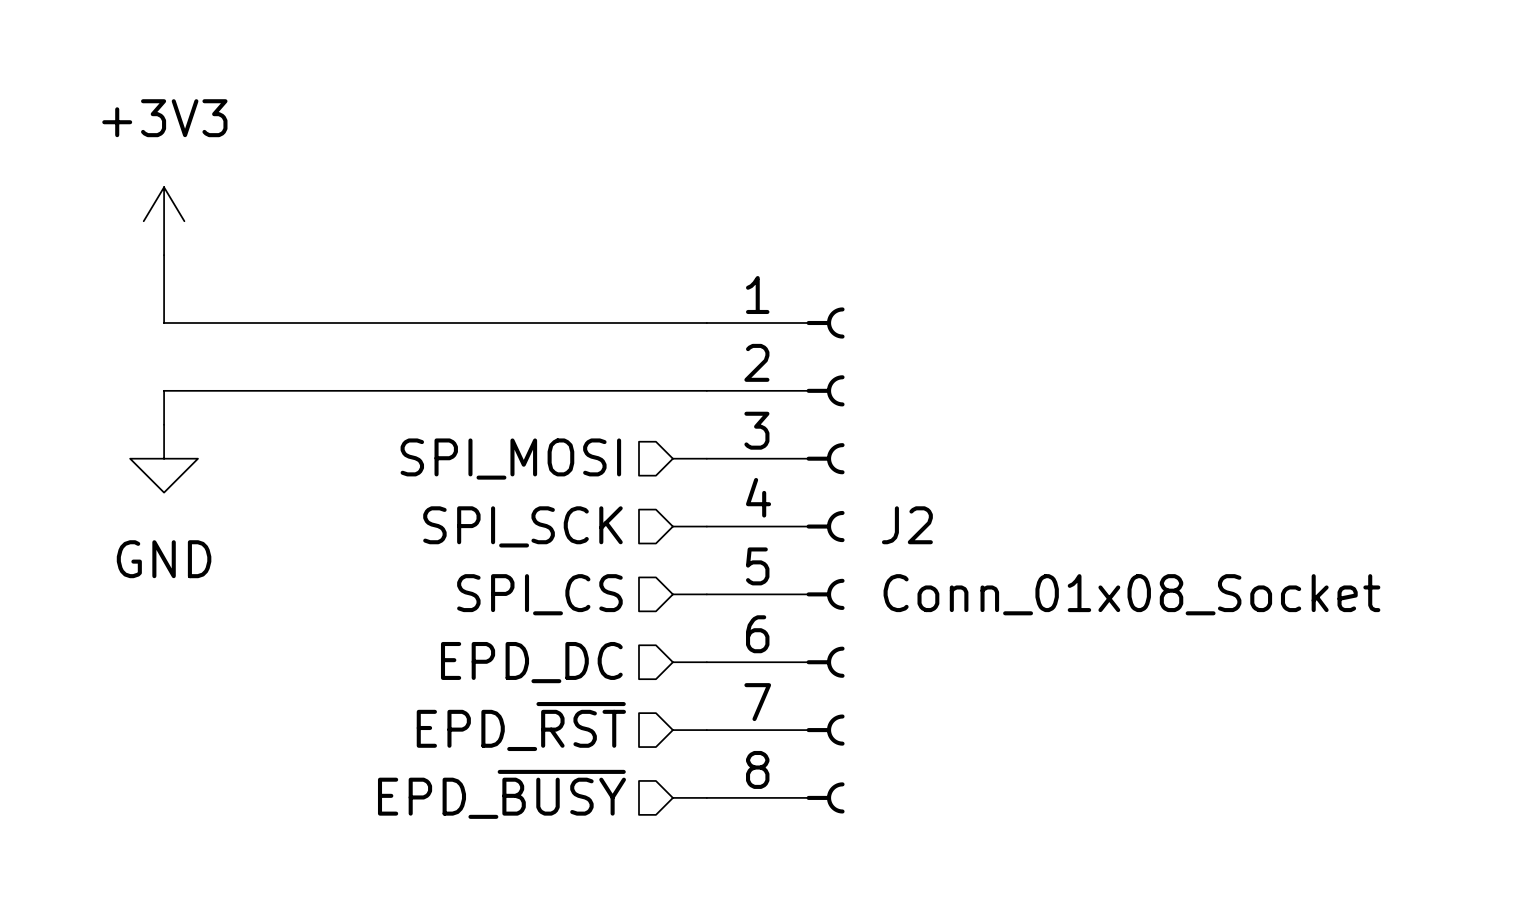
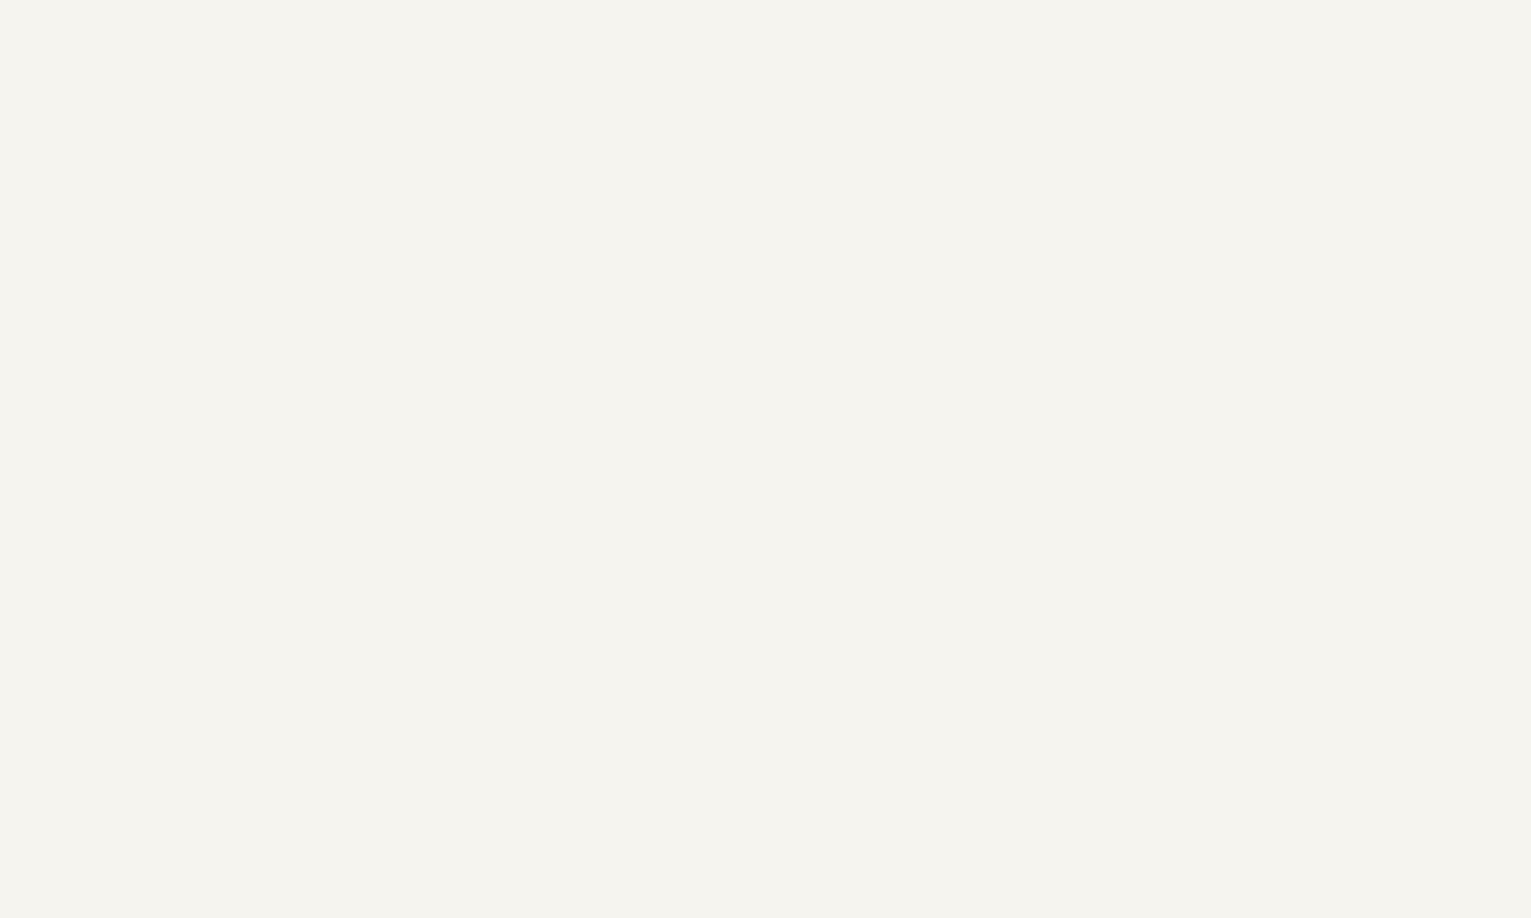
power symbol: +3V3 (164, 221) -> none
wire: (164, 255) (164, 323) (706, 323) -> none
wire: (706, 390) (164, 390) (164, 424) -> none
power symbol: GND (164, 458) -> none
wire: (672, 458) (706, 458) -> none
hierarchical label: SPI_MOSI (510, 459) -> none
hierarchical label: SPI_SCK (522, 526) -> none
wire: (672, 526) (706, 526) -> none
J2: Conn_01x08_Socket (775, 560) -> none
hierarchical label: SPI_CS (539, 594) -> none
wire: (672, 594) (706, 594) -> none
hierarchical label: EPD_DC (531, 662) -> none
wire: (672, 662) (706, 662) -> none
hierarchical label: EPD_~{RST} (521, 726) -> none
wire: (672, 730) (706, 730) -> none
hierarchical label: EPD_~{BUSY} (501, 794) -> none
wire: (672, 797) (706, 797) -> none

